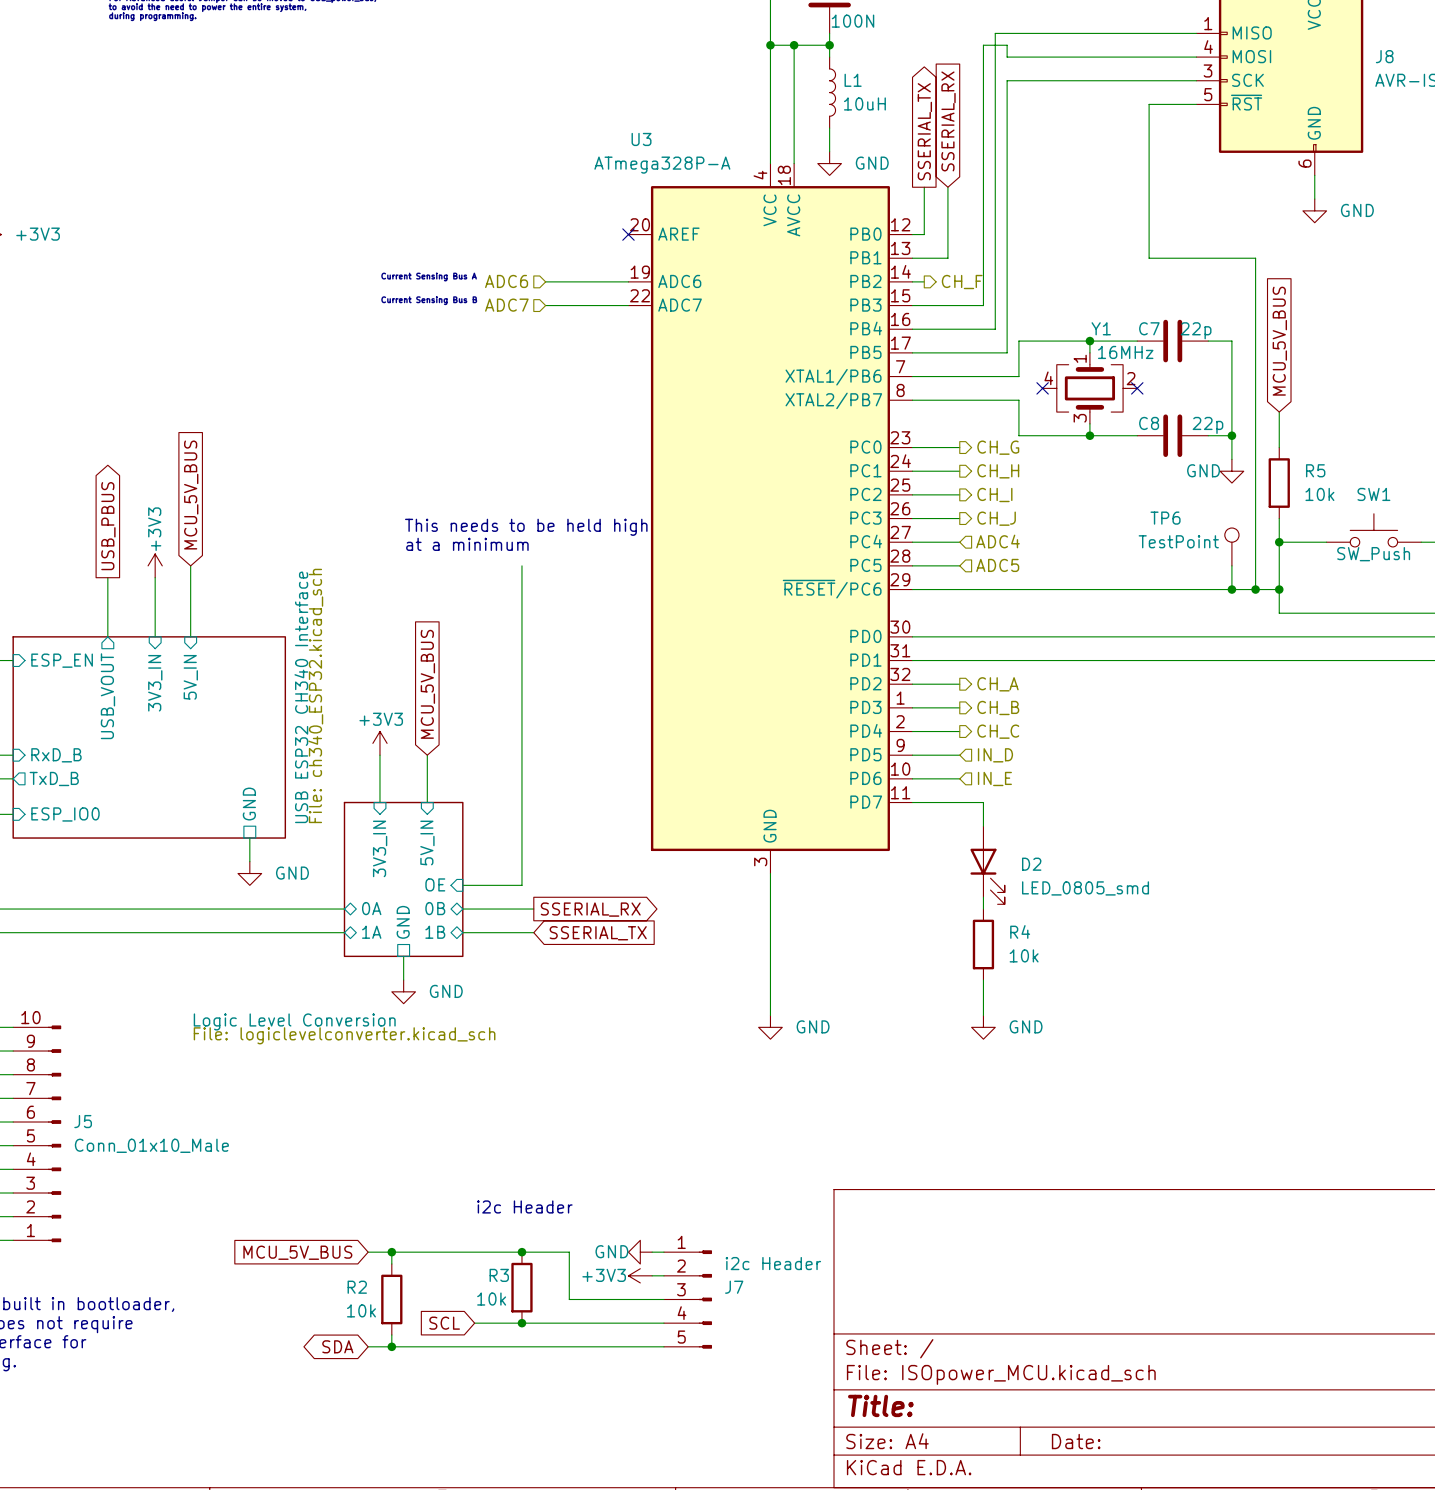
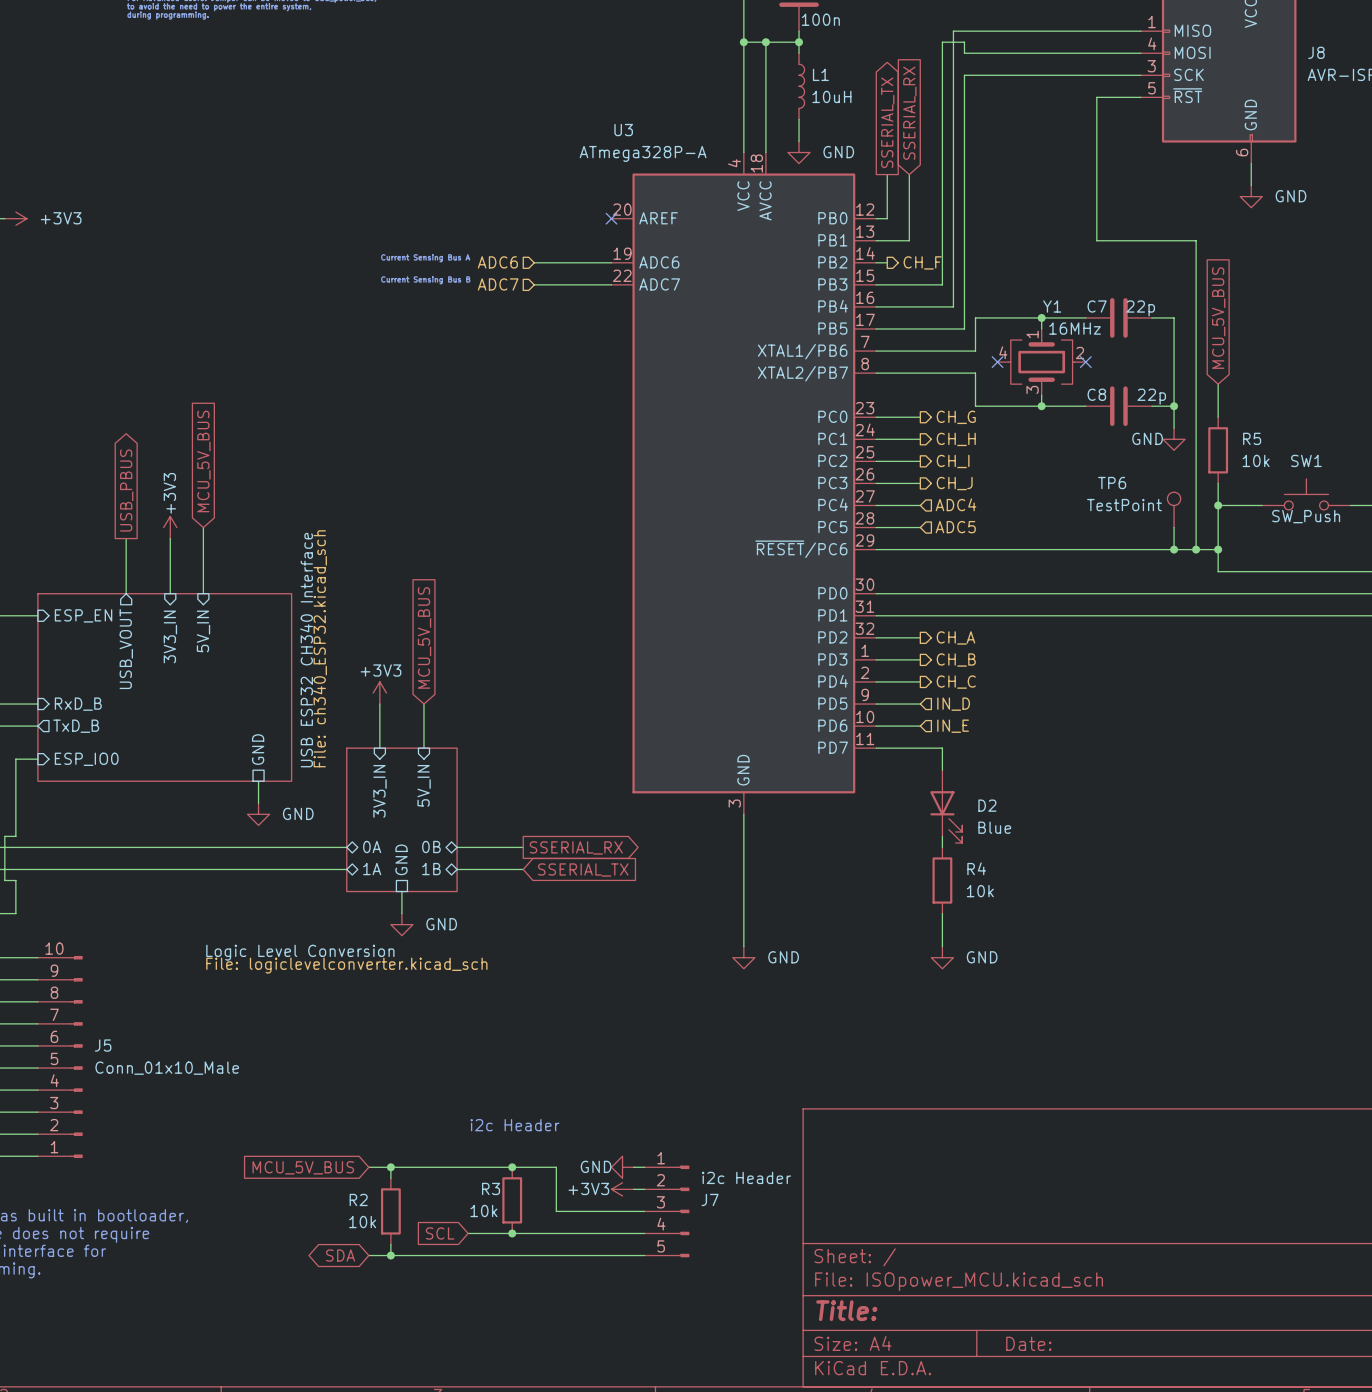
part value: 100N (853, 21) -> 100n (820, 19)
text: This needs to be held high (526, 527) -> none
text: at a minimum (467, 544) -> none
wire: (521, 565) (521, 885) (462, 885) -> none
sheet pin: OE (435, 884) -> none
D2 value: LED_0805_smd (1085, 888) -> Blue (994, 827)

